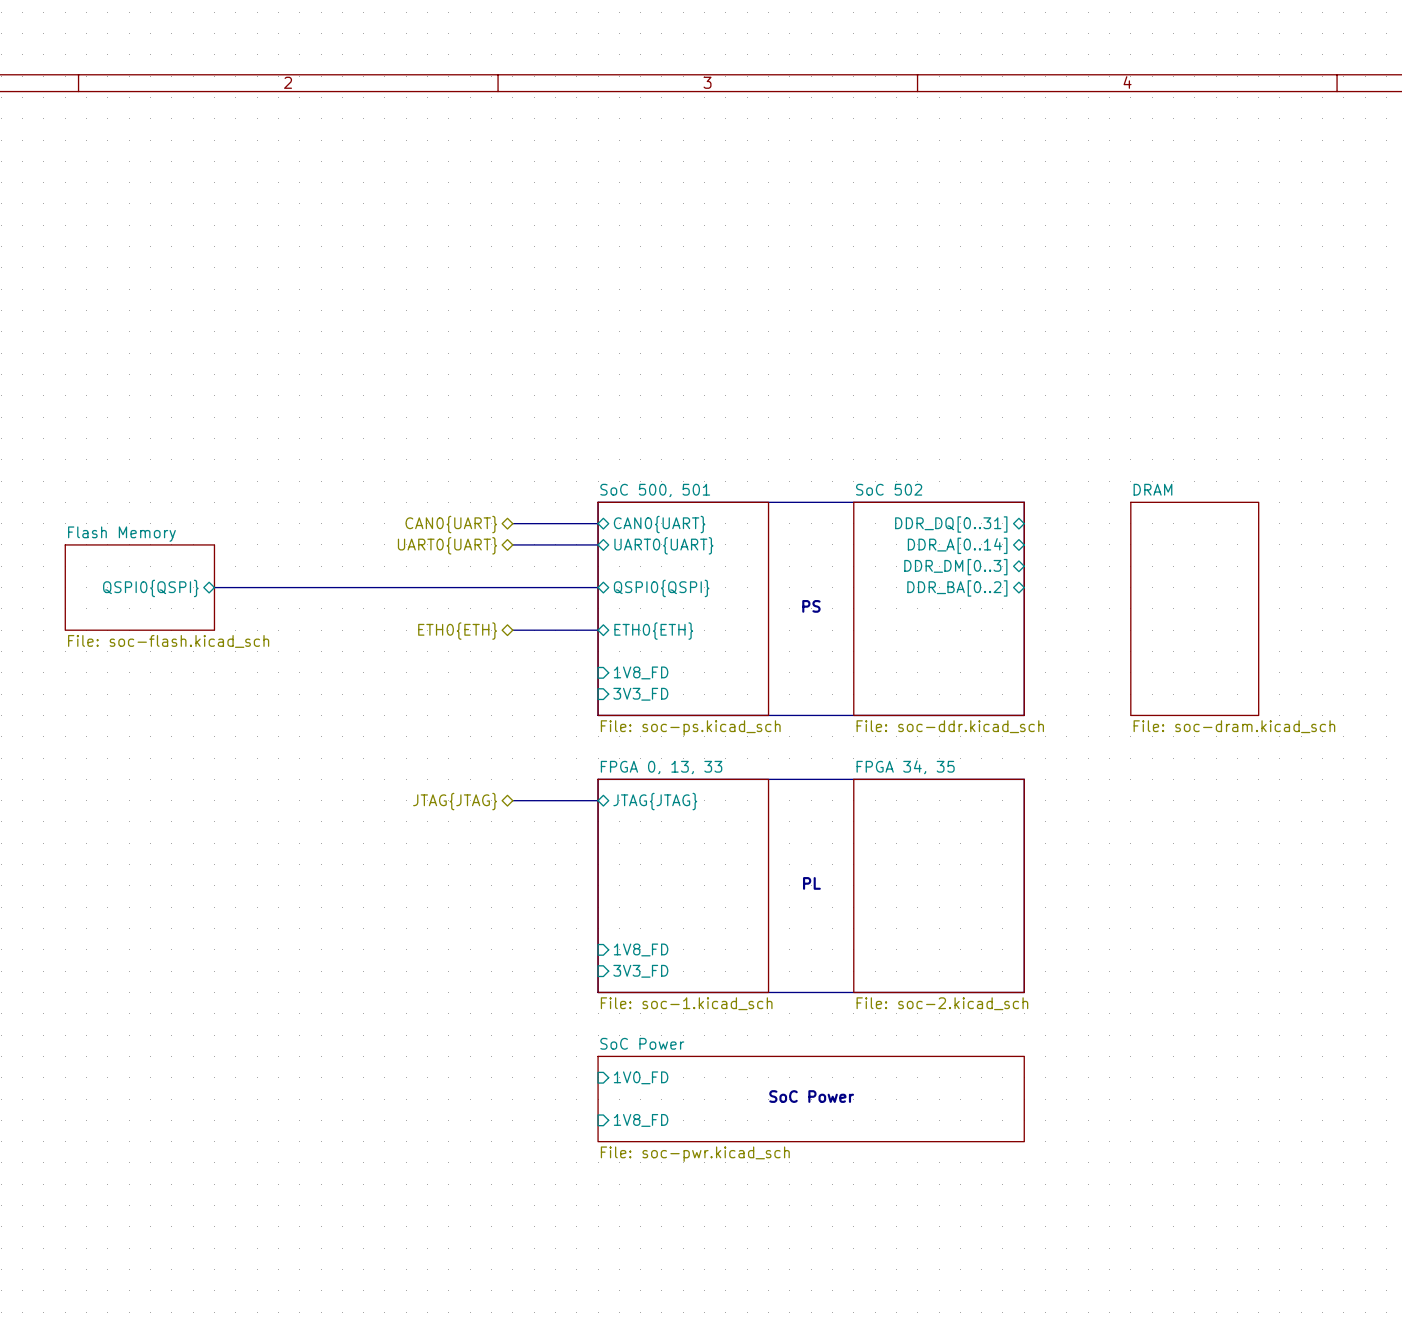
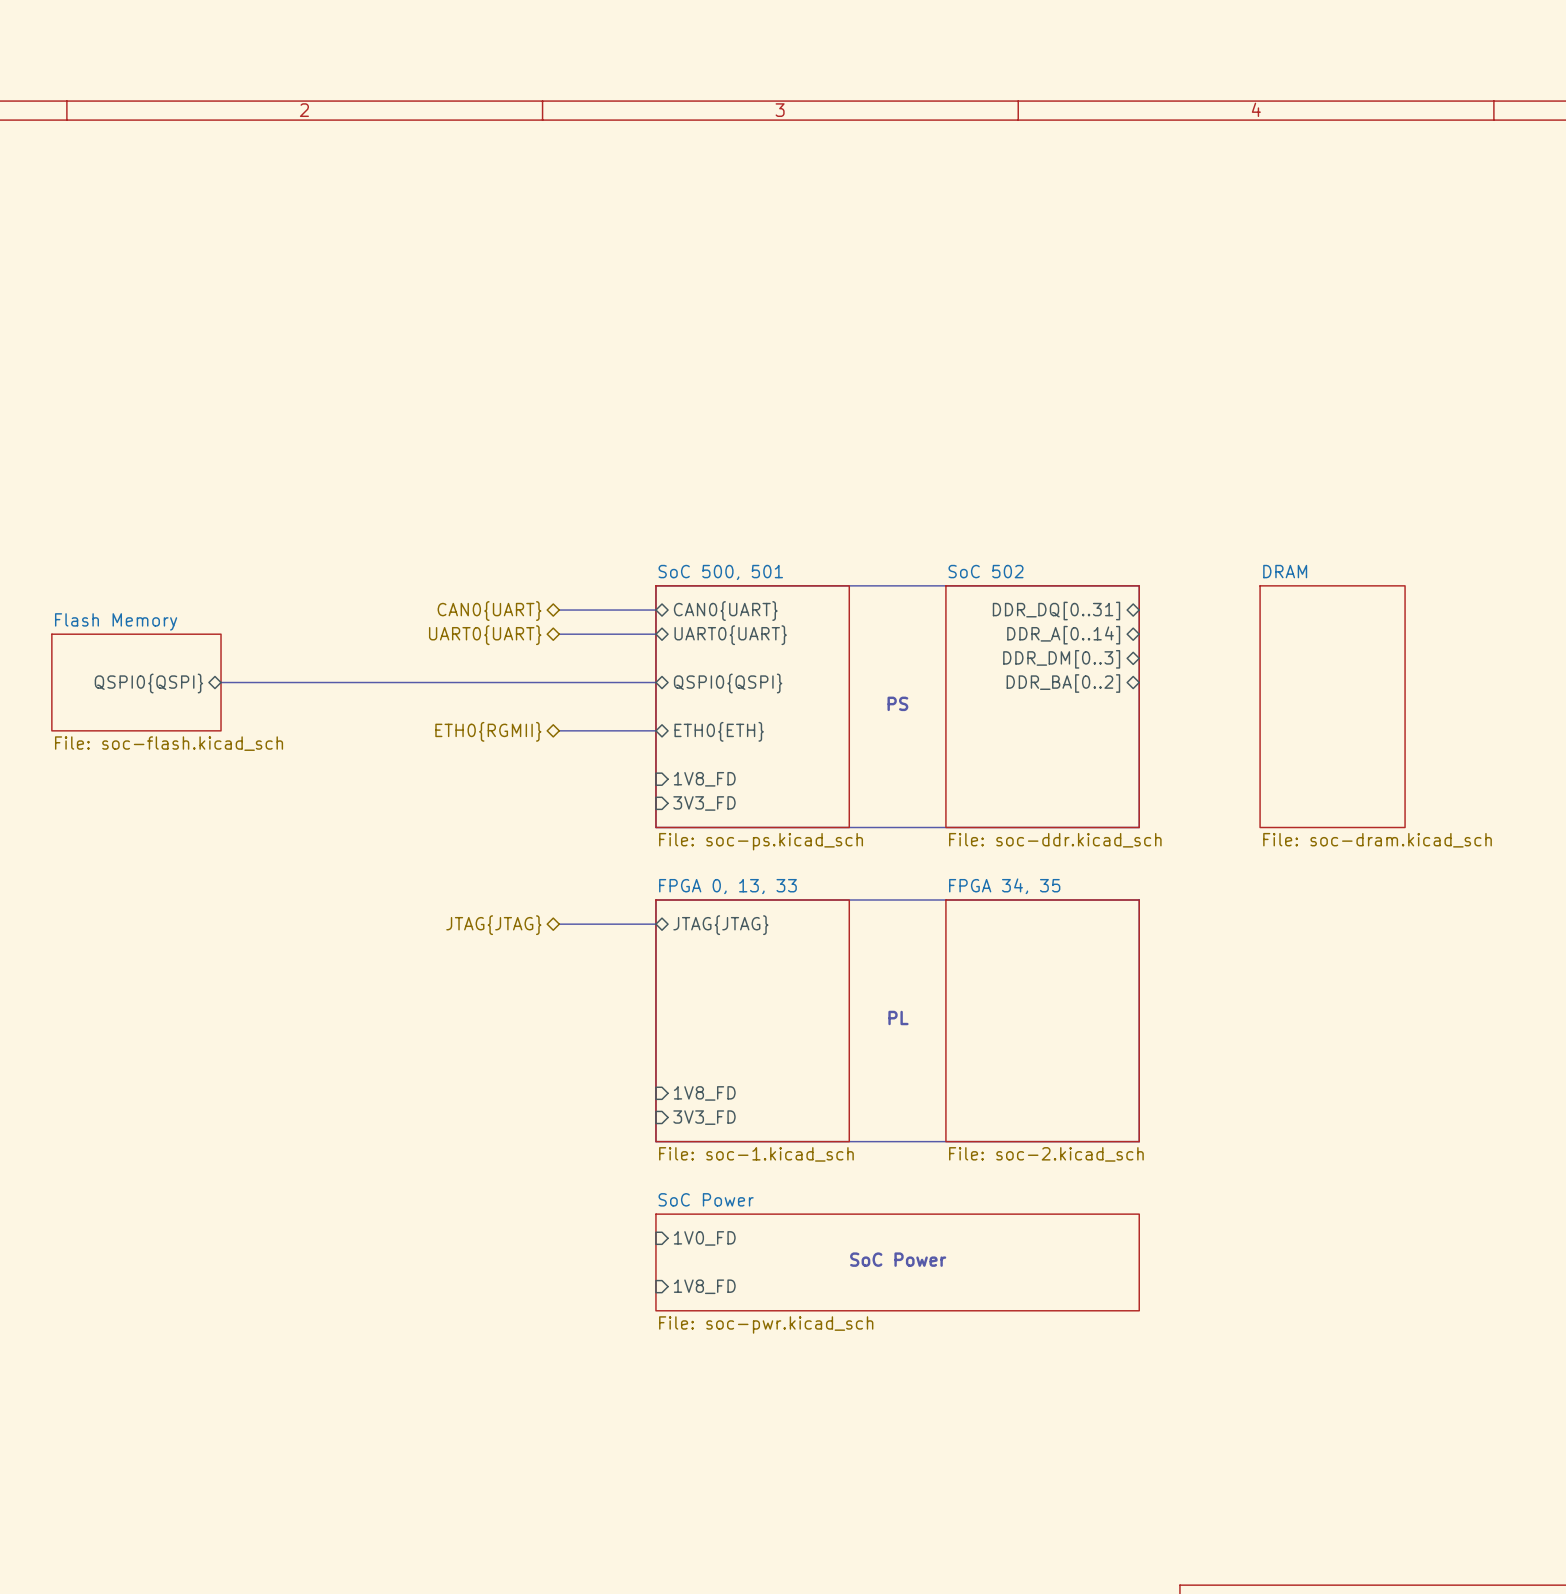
hierarchical label: ETH0{ETH} (457, 631) -> ETH0{RGMII} (488, 731)

